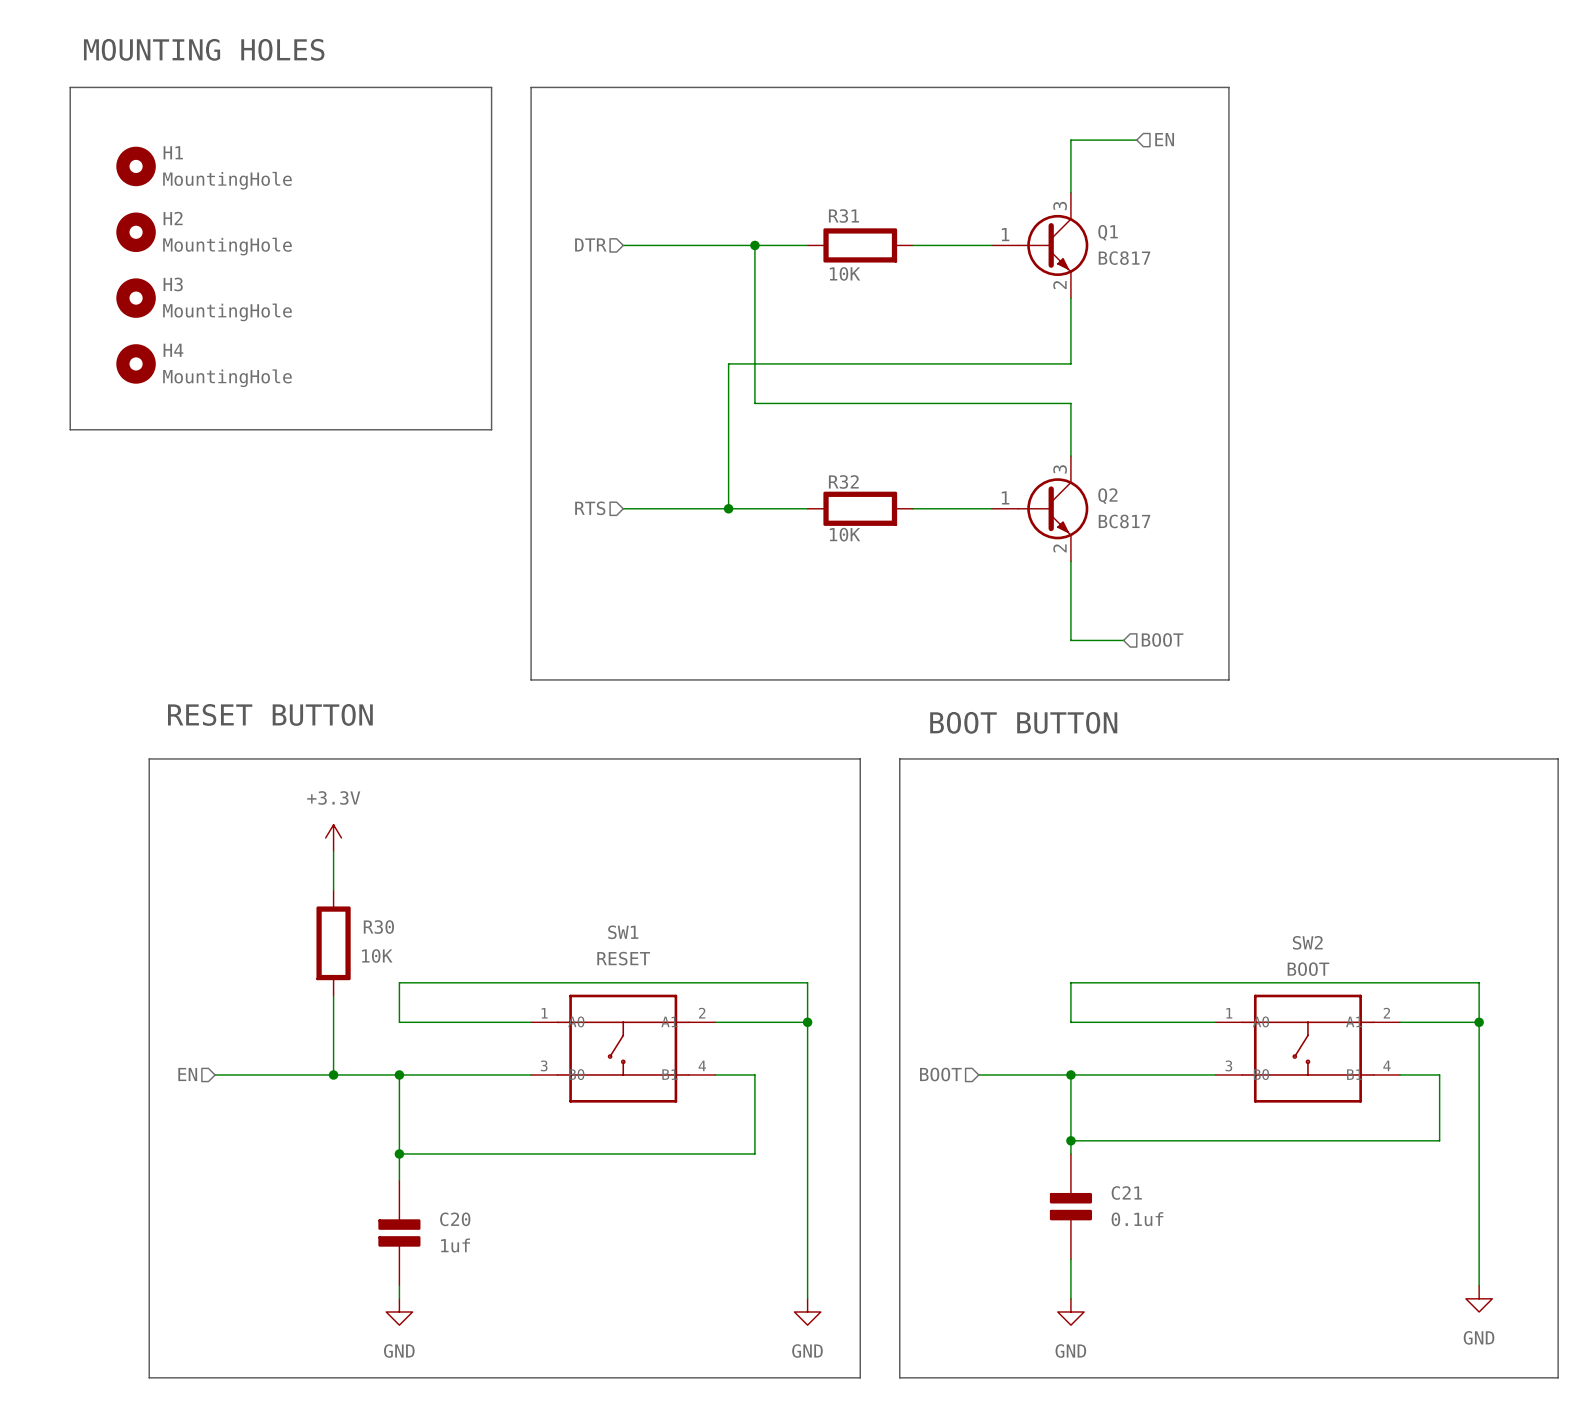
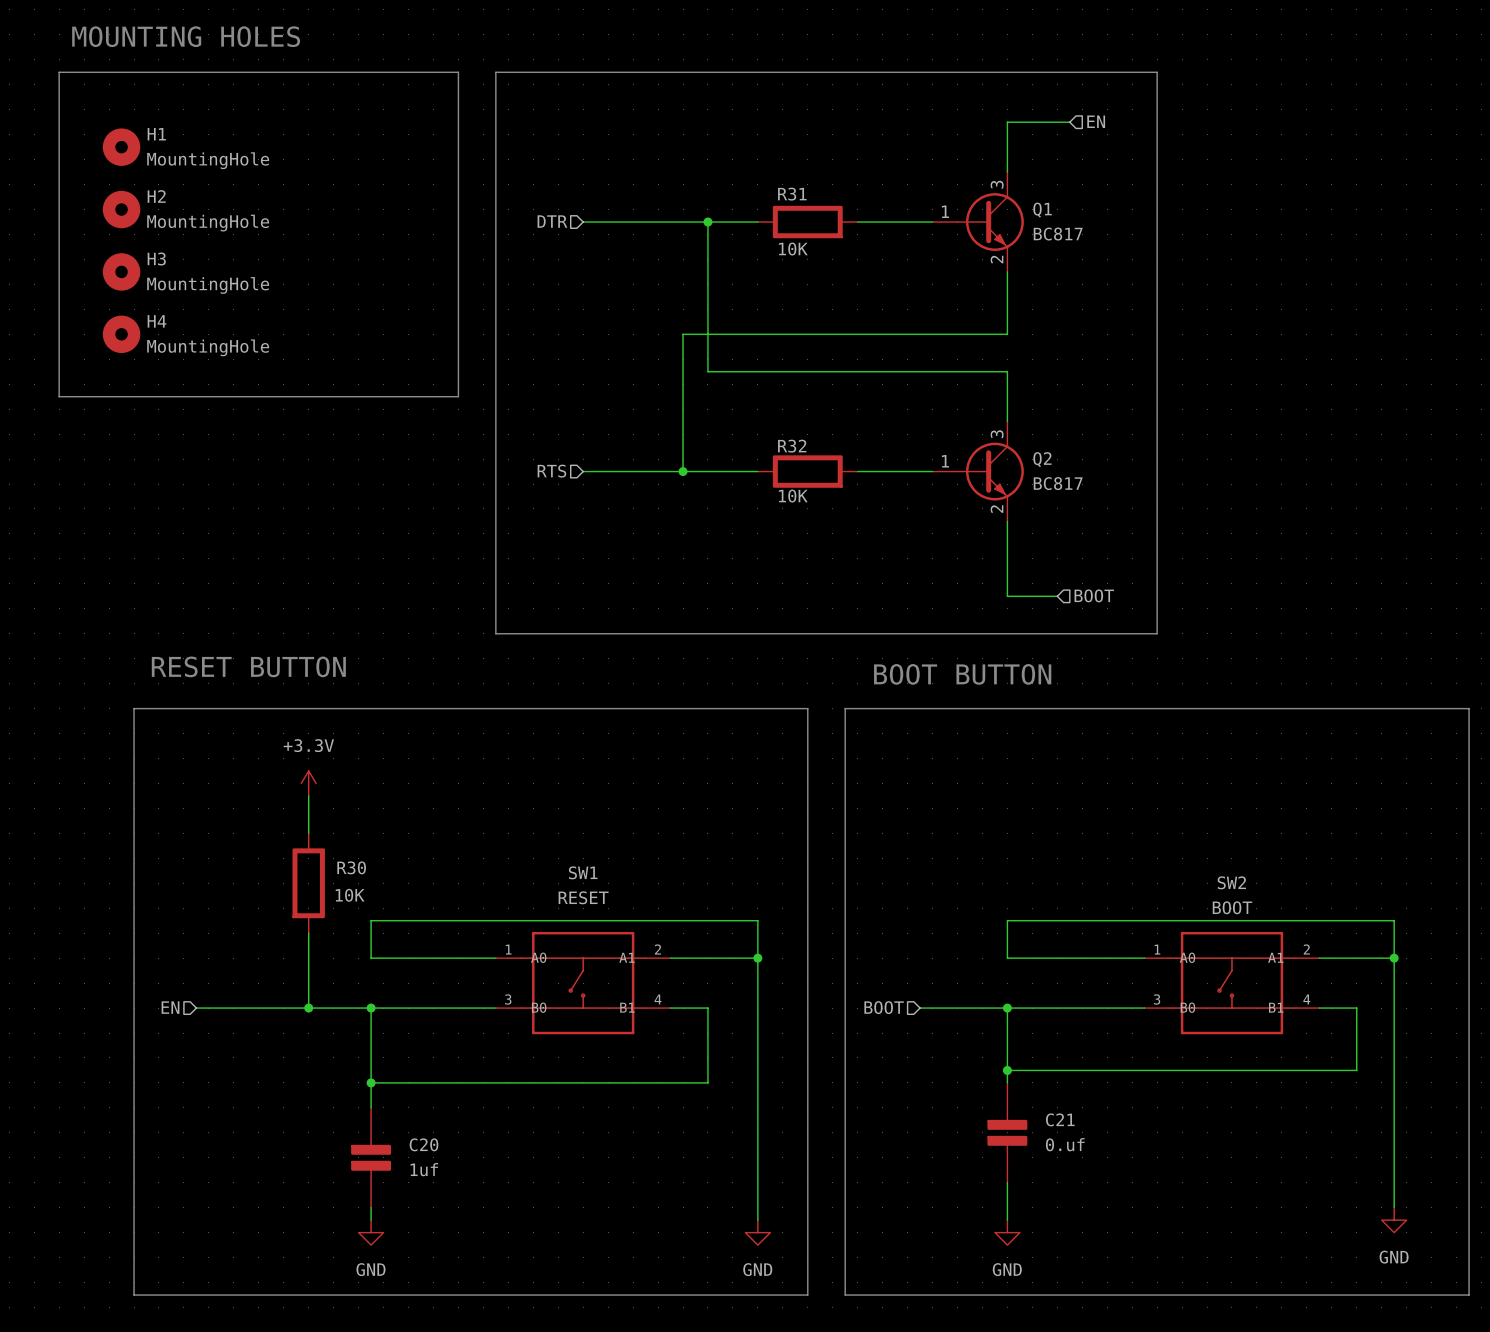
C21 value: 0.1uf (1137, 1219) -> 0.uf (1065, 1144)

